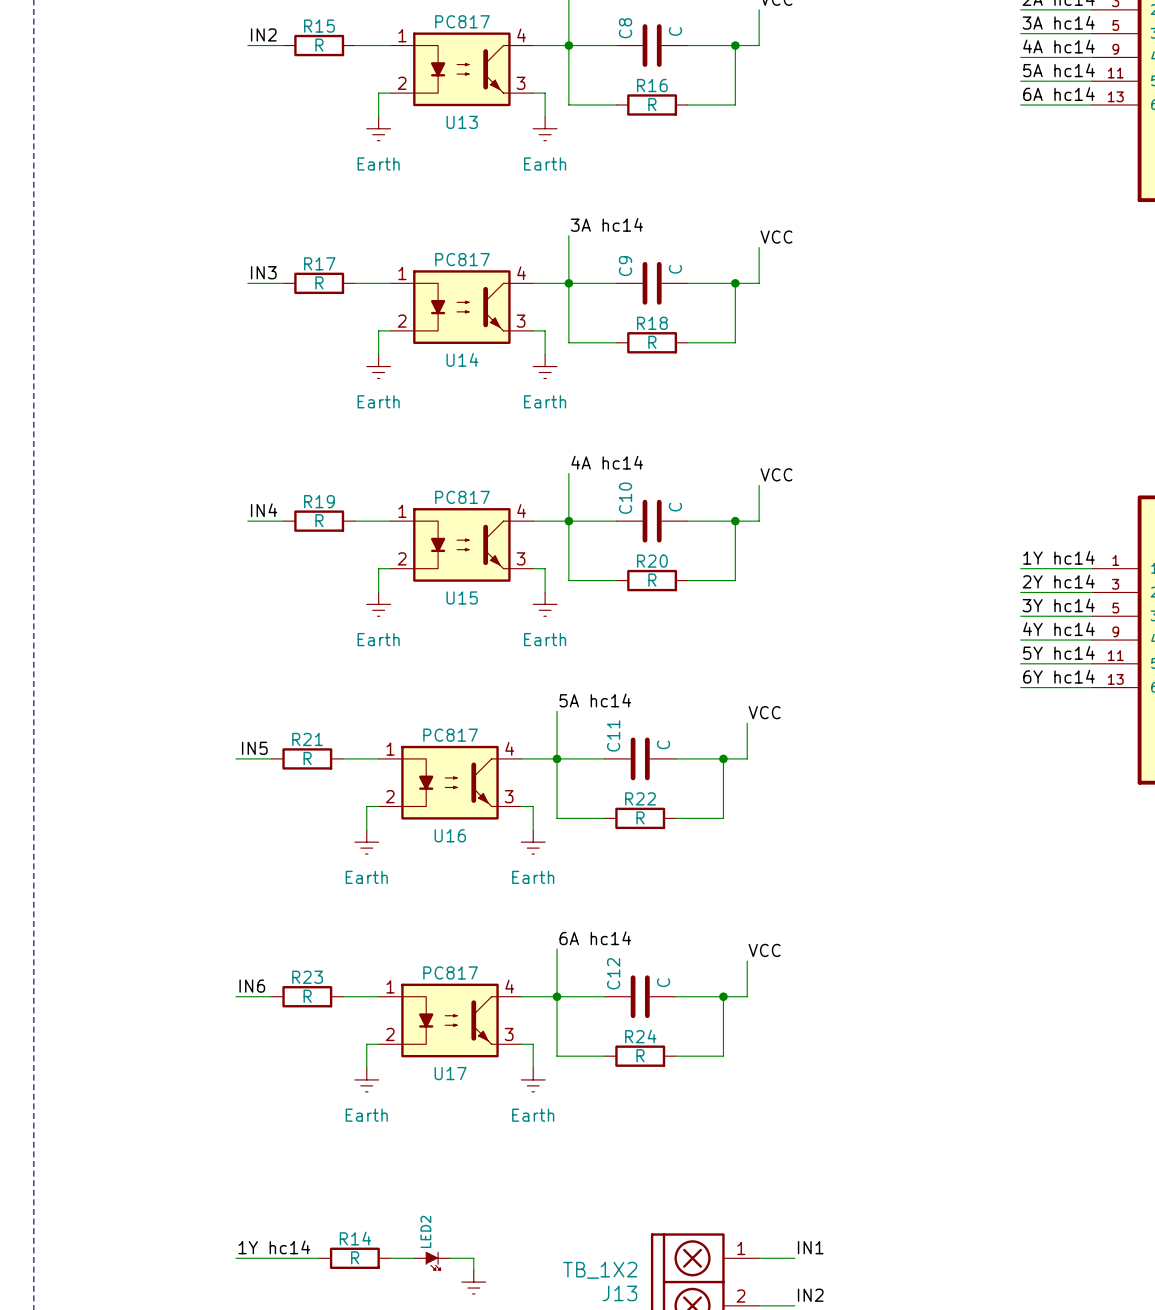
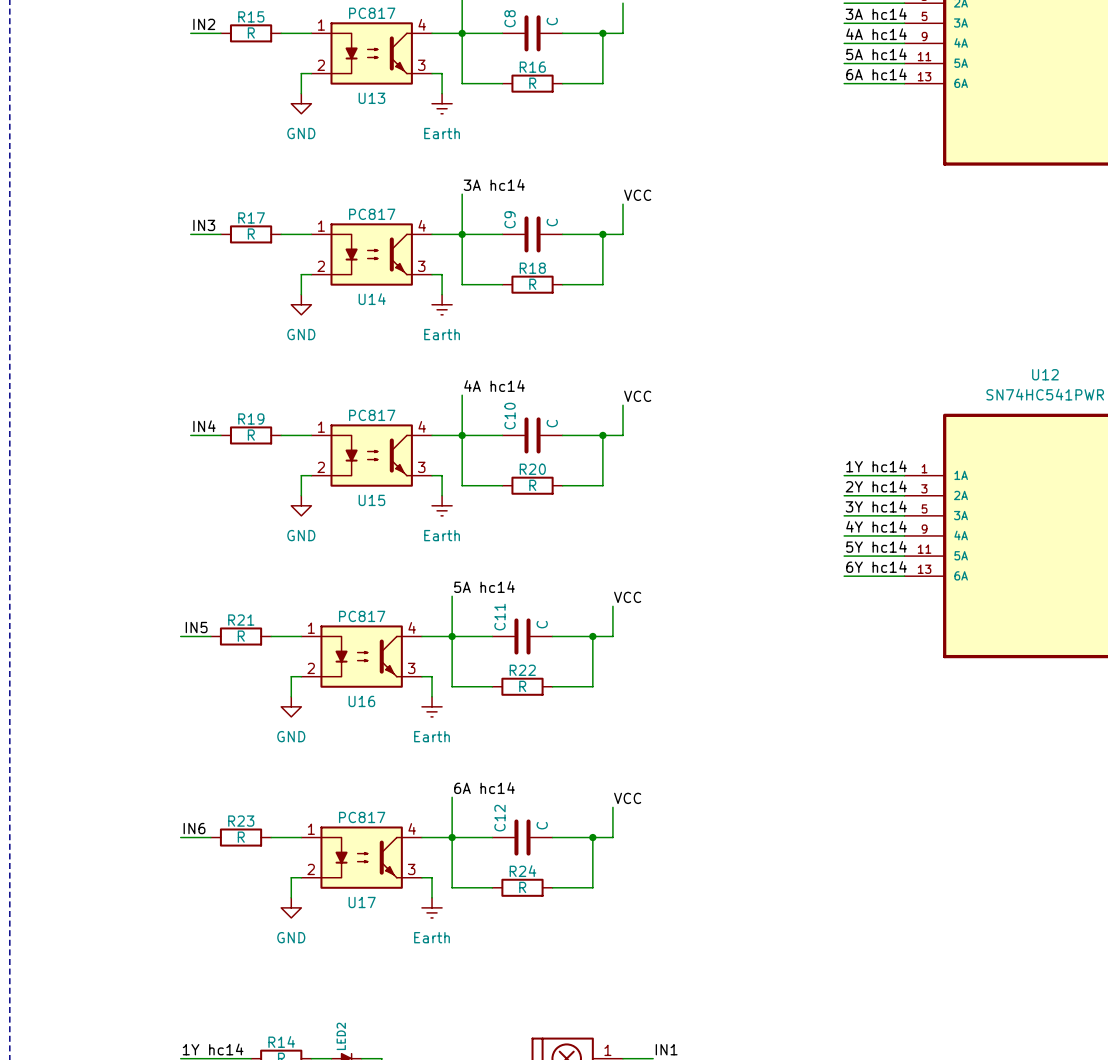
power symbol: Earth (378, 128) -> GND (301, 103)
power symbol: Earth (378, 366) -> GND (301, 304)
power symbol: Earth (378, 604) -> GND (301, 505)
power symbol: Earth (366, 842) -> GND (291, 706)
power symbol: Earth (366, 1079) -> GND (291, 907)

